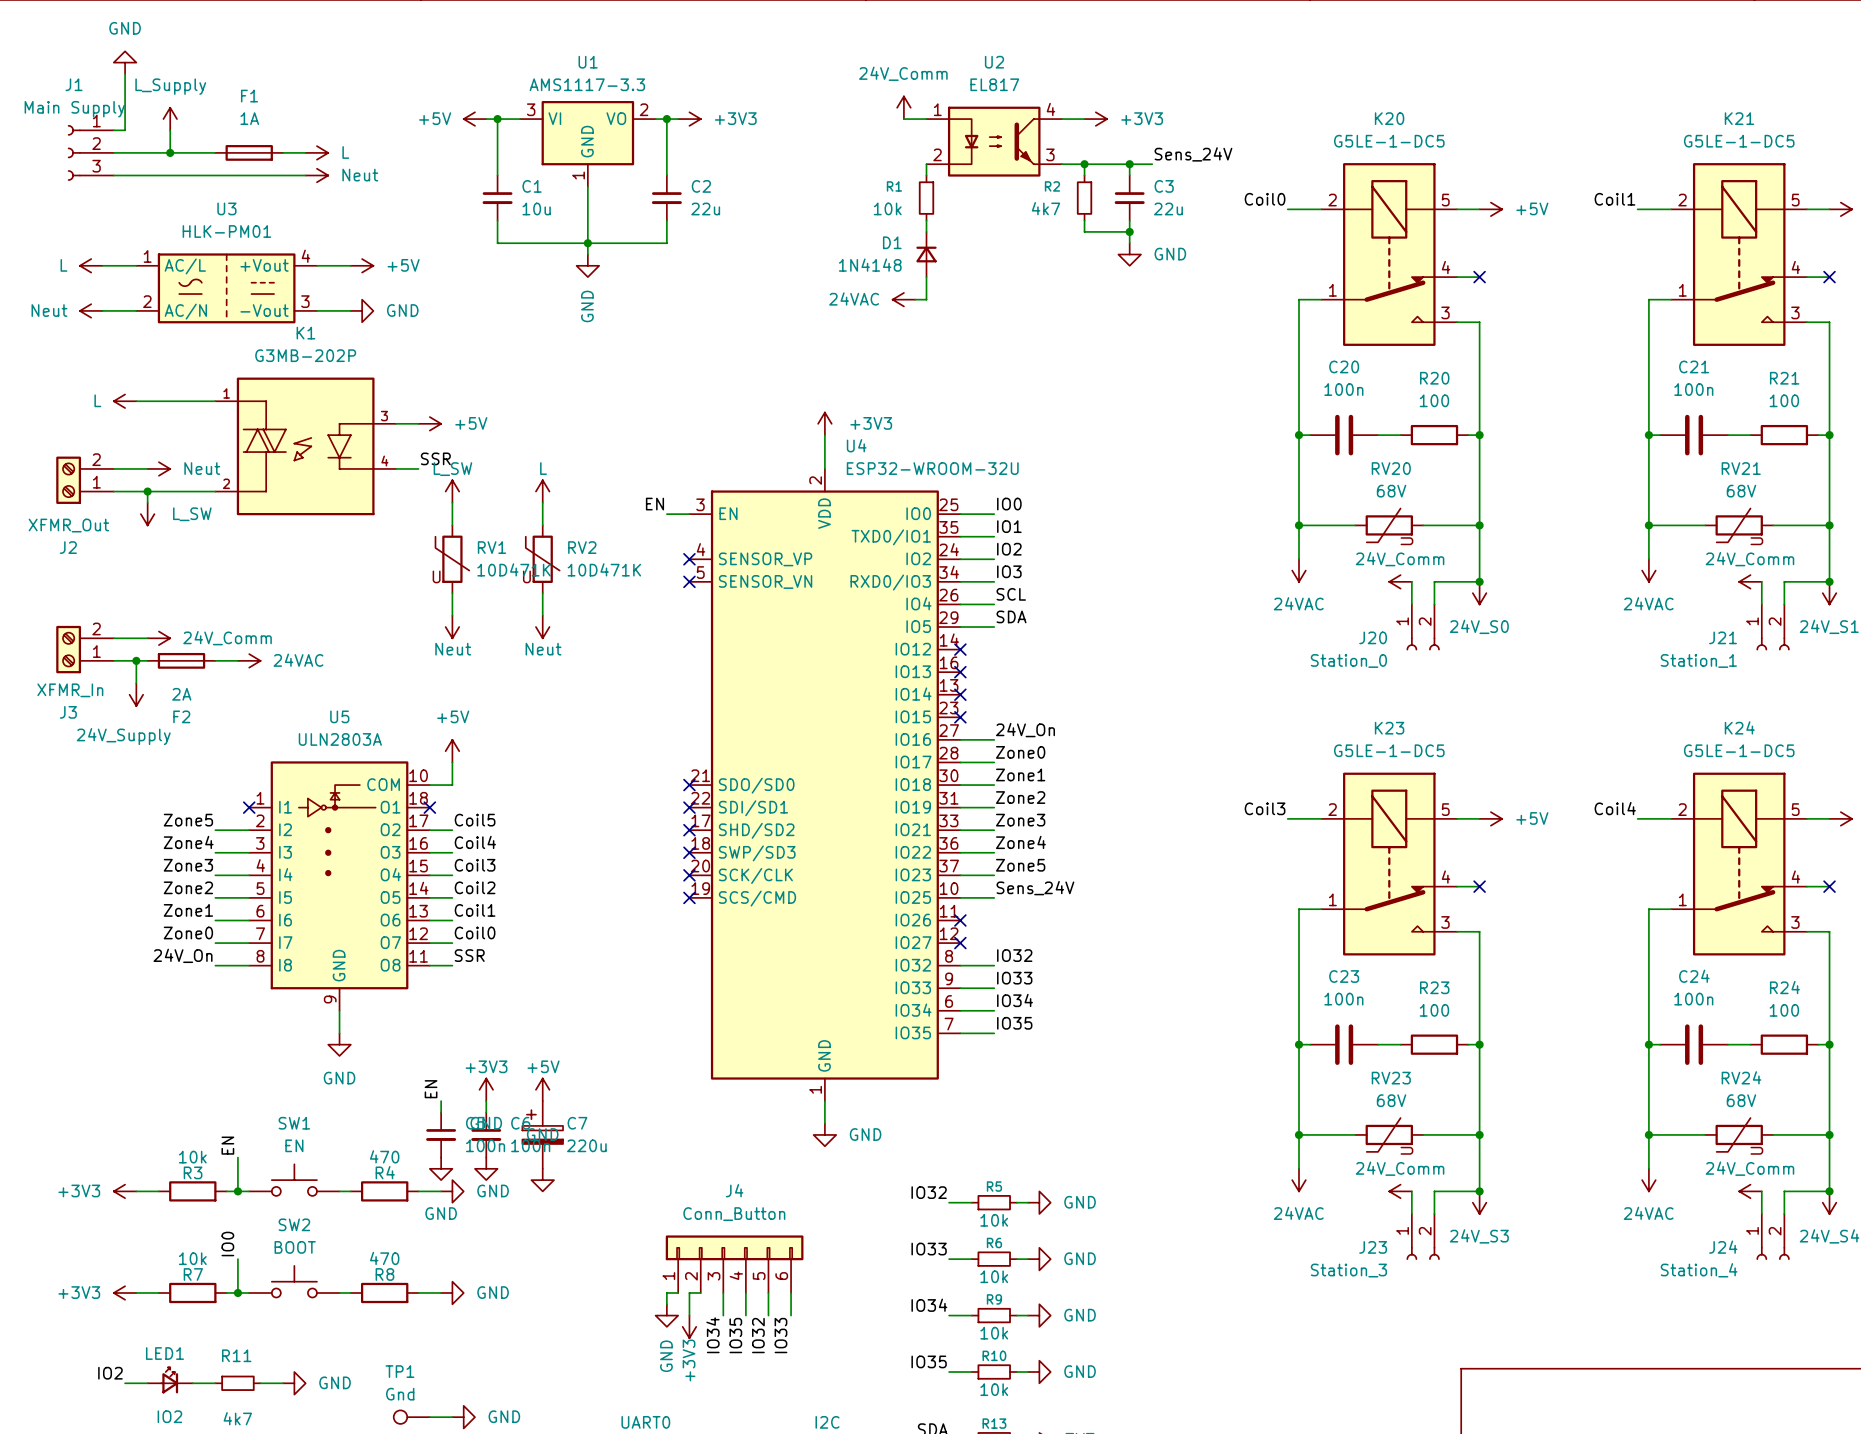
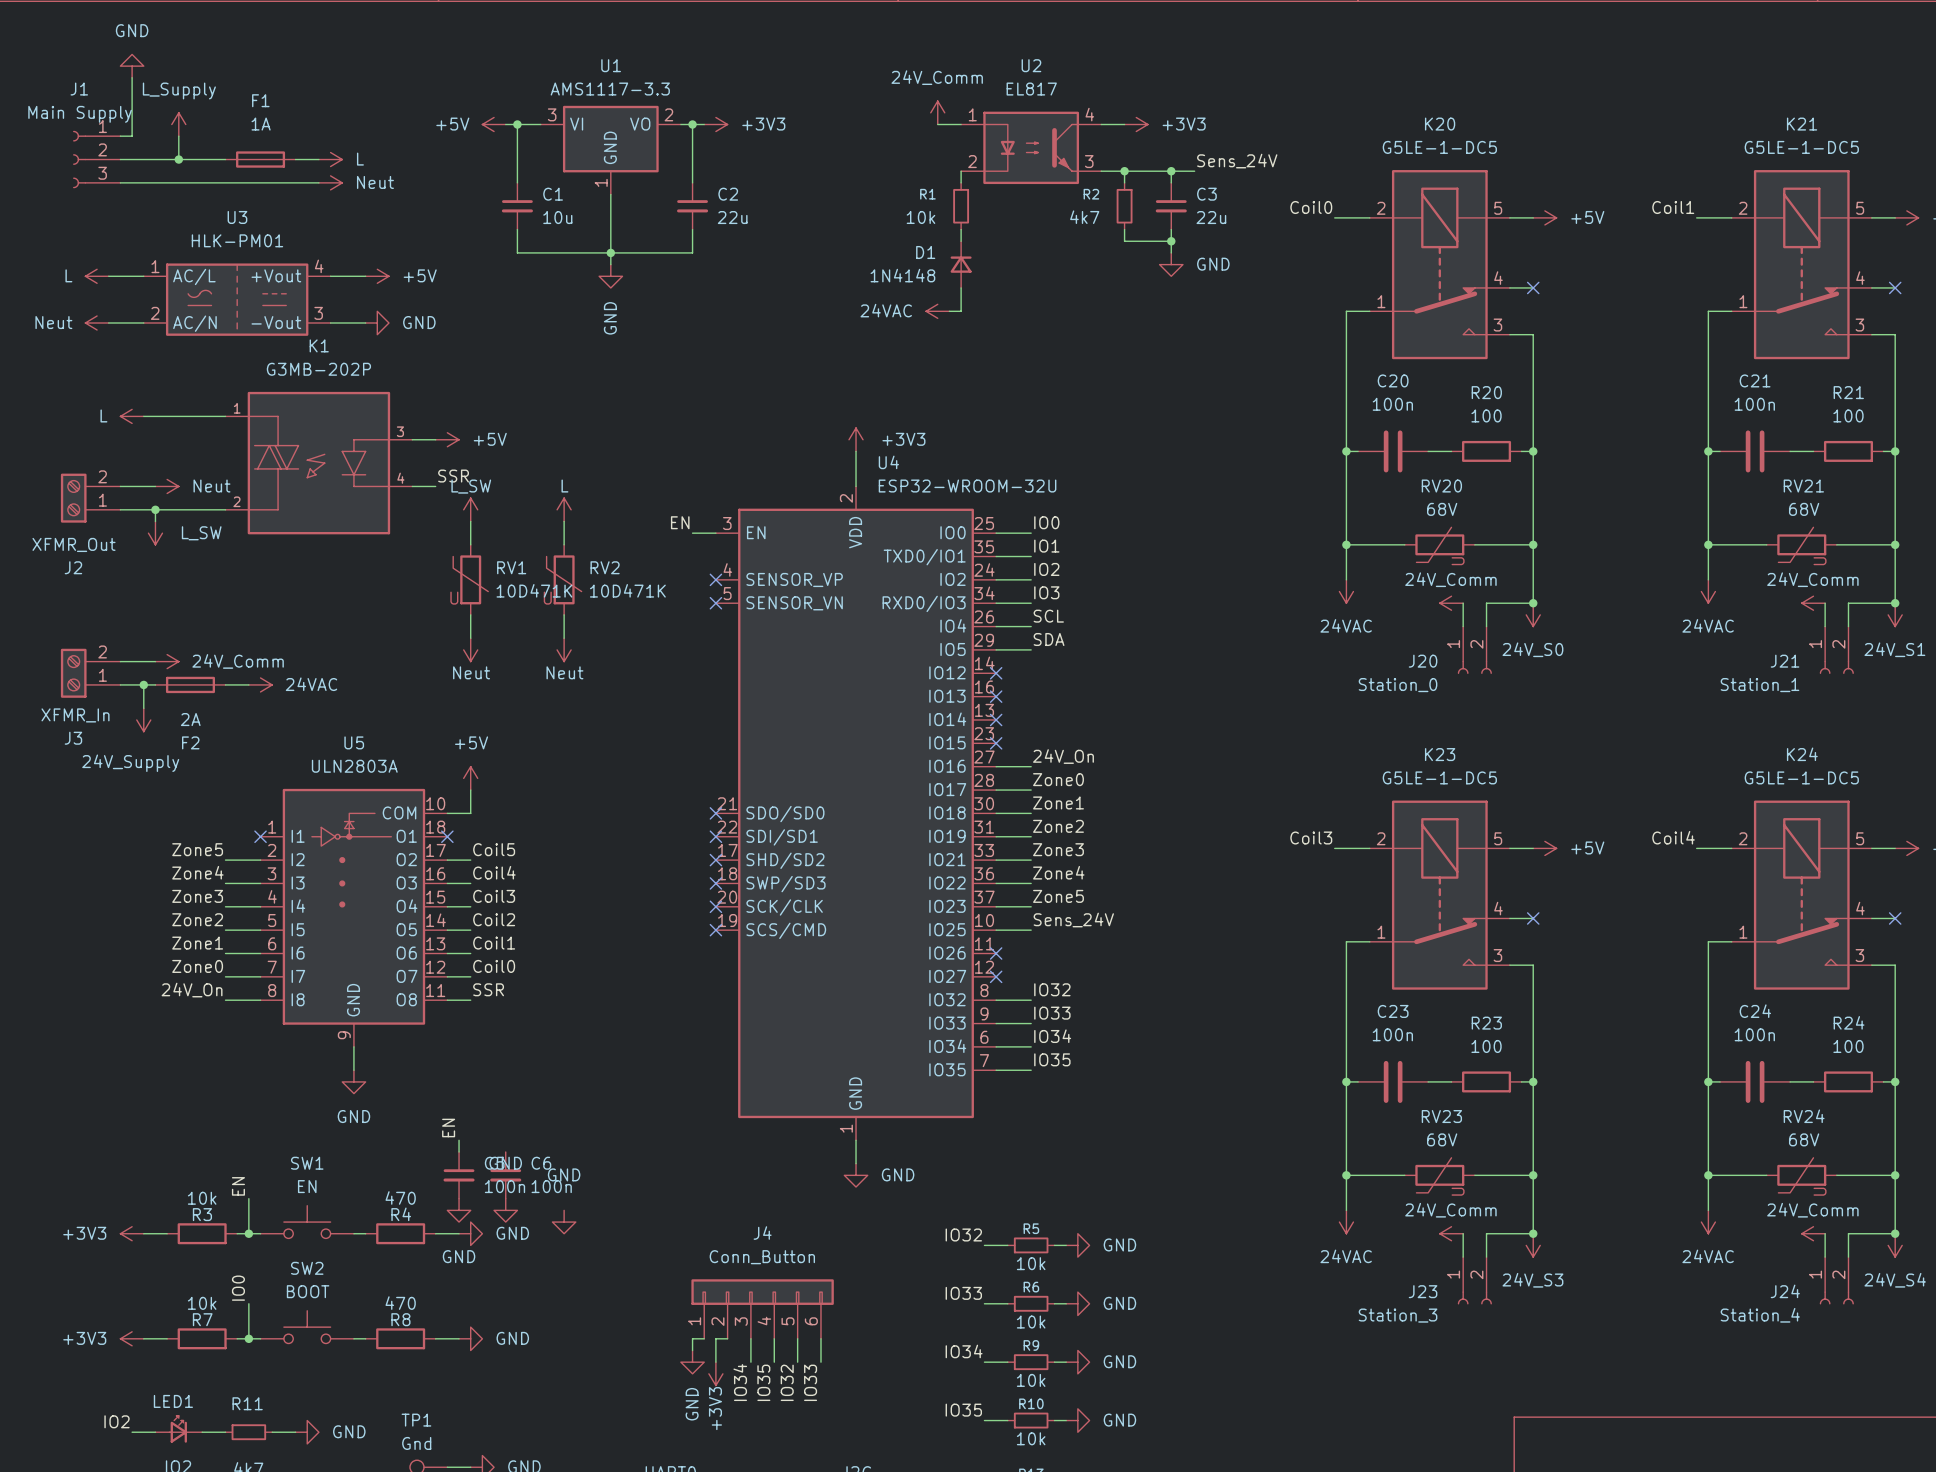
power symbol: +3V3 (486, 1089) -> none
power symbol: +5V (542, 1089) -> none
wire: (486, 1101) (486, 1112) -> none
C7: 220u (542, 1134) -> none

